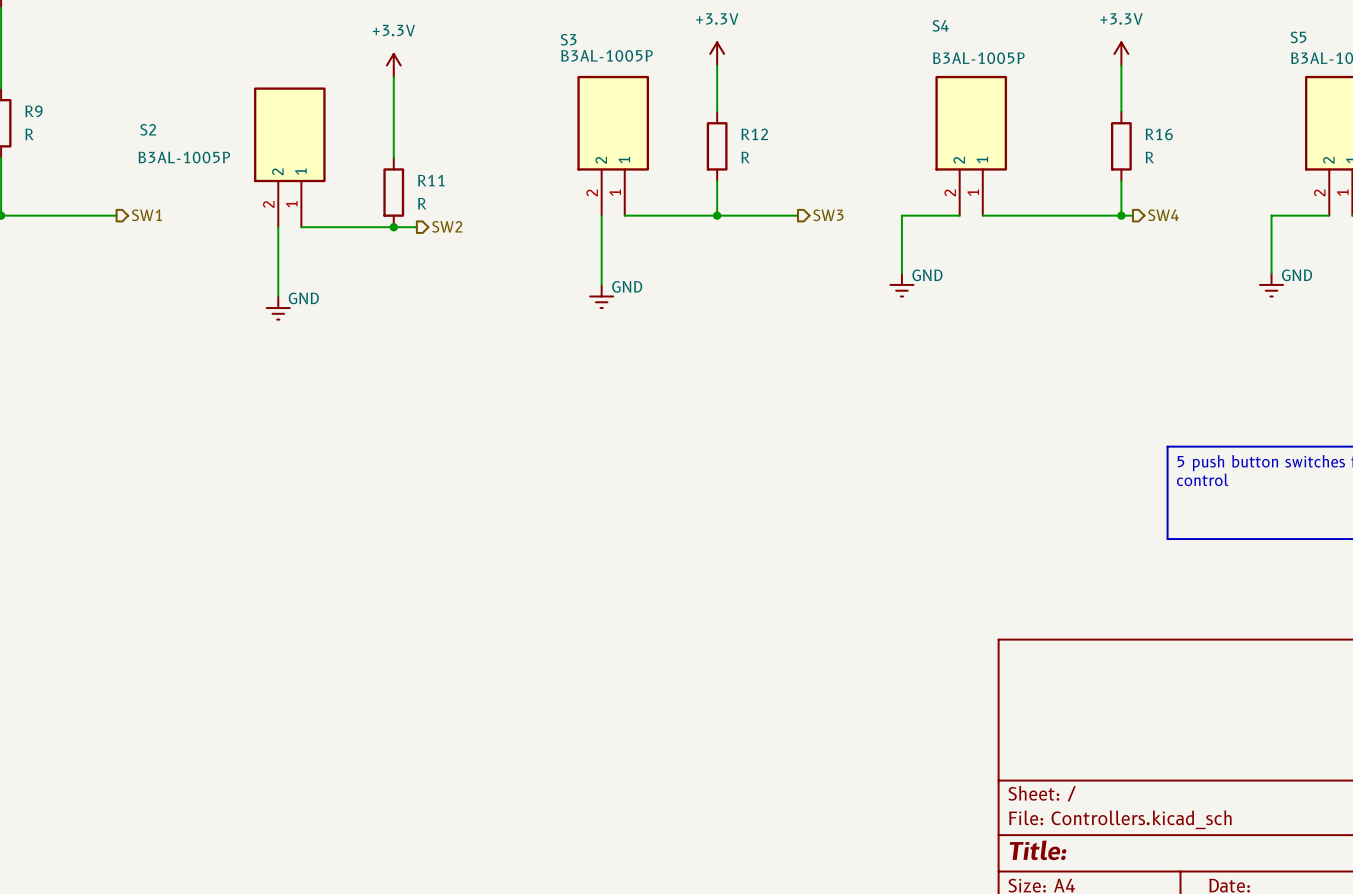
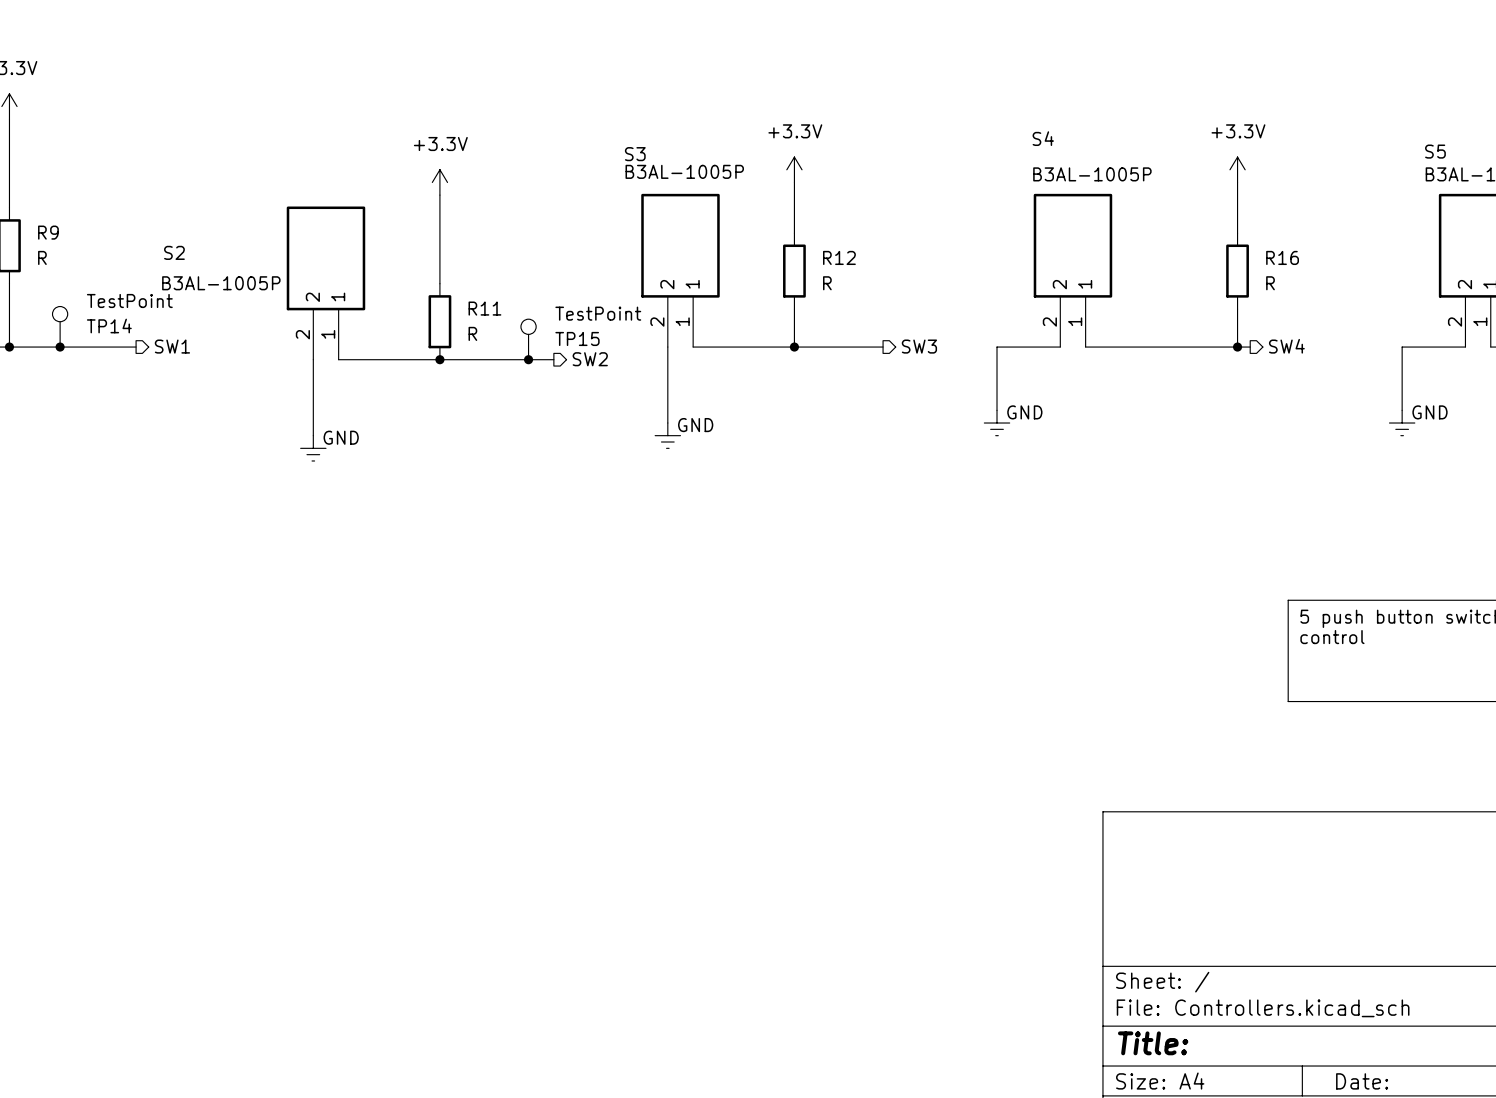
TP14: none -> TestPoint (60, 326)
TP15: none -> TestPoint (528, 339)
junction: none -> (60, 347)
hierarchical label position: SW2 (447, 226) -> SW2 (590, 359)
wire: none -> (465, 359) (553, 359)
junction: none -> (528, 359)

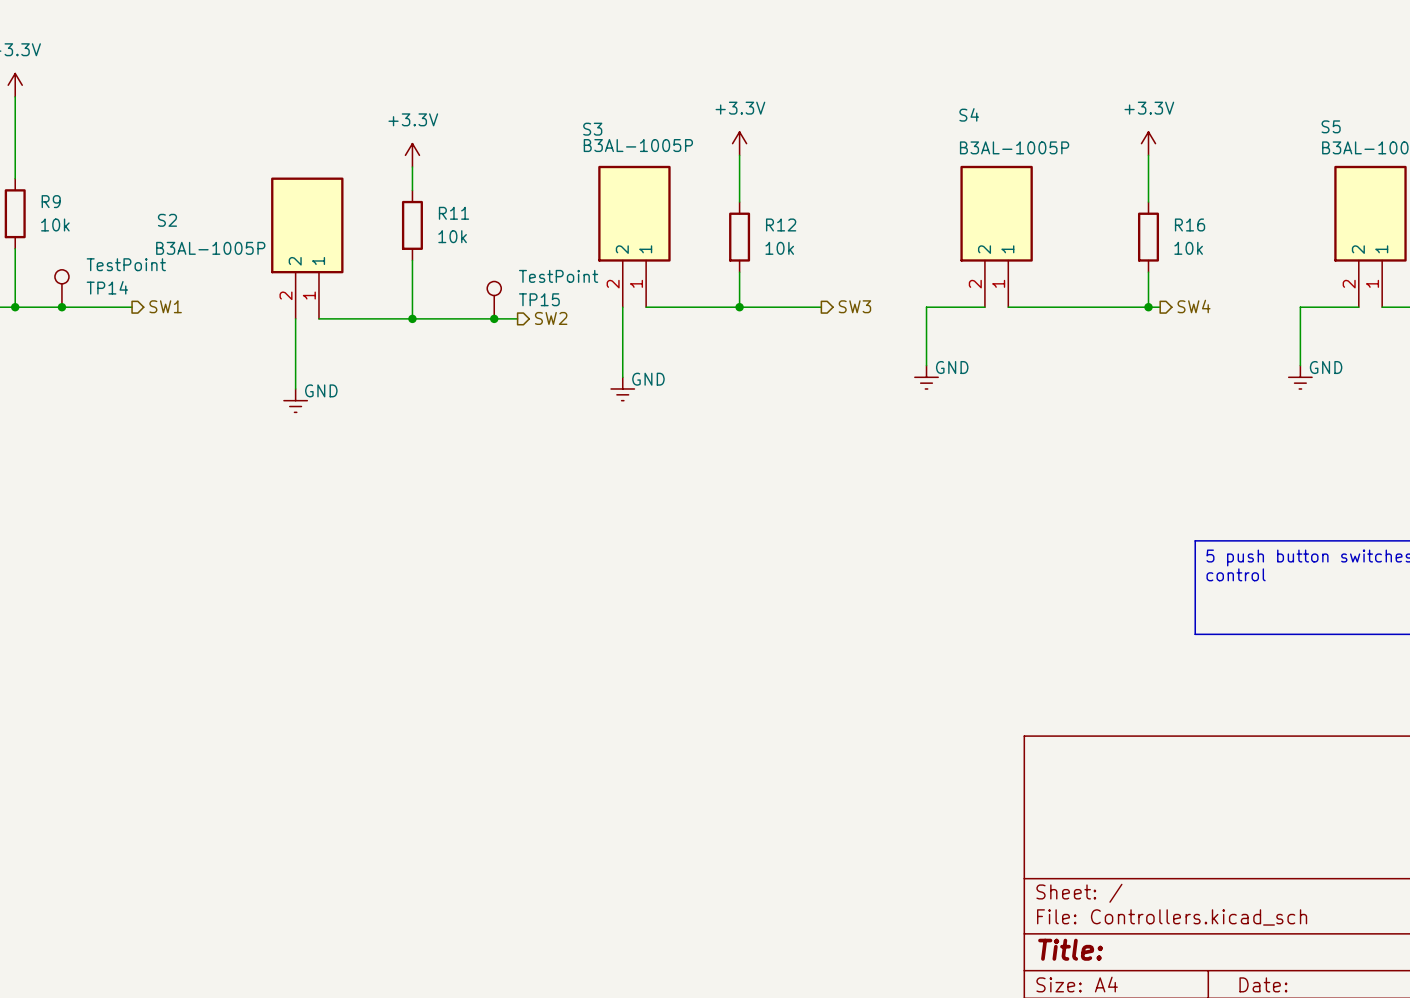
wire: (439, 220) (439, 283) -> (412, 260) (412, 318)
R9 value: R (42, 257) -> 10k (55, 224)
R12 value: R (827, 283) -> 10k (779, 248)
R16 value: R (1270, 283) -> 10k (1188, 248)
R11 position: (439, 321) -> (412, 225)
R11 value: R (472, 333) -> 10k (452, 236)

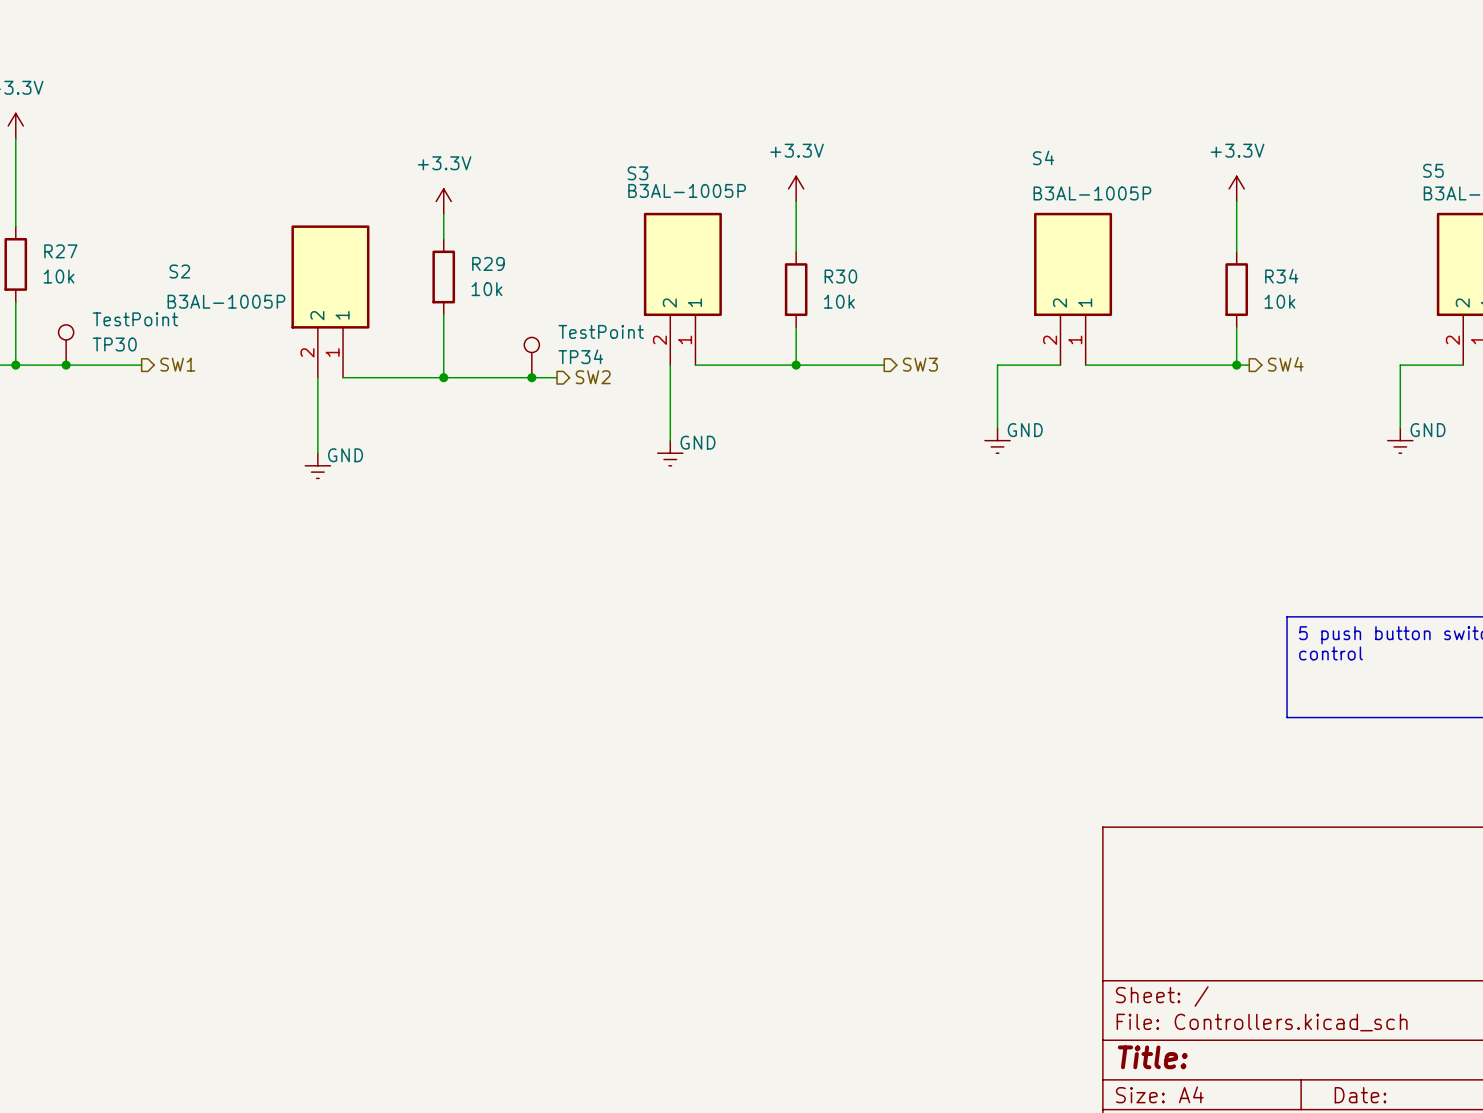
R9 name: R9 (51, 201) -> R27 (60, 251)
R11 name: R11 (453, 213) -> R29 (488, 263)
R12 name: R12 (781, 224) -> R30 (840, 276)
R16 name: R16 (1190, 224) -> R34 (1281, 276)
TP14 name: TP14 (107, 287) -> TP30 (114, 344)
TP15 name: TP15 (539, 299) -> TP34 (580, 356)

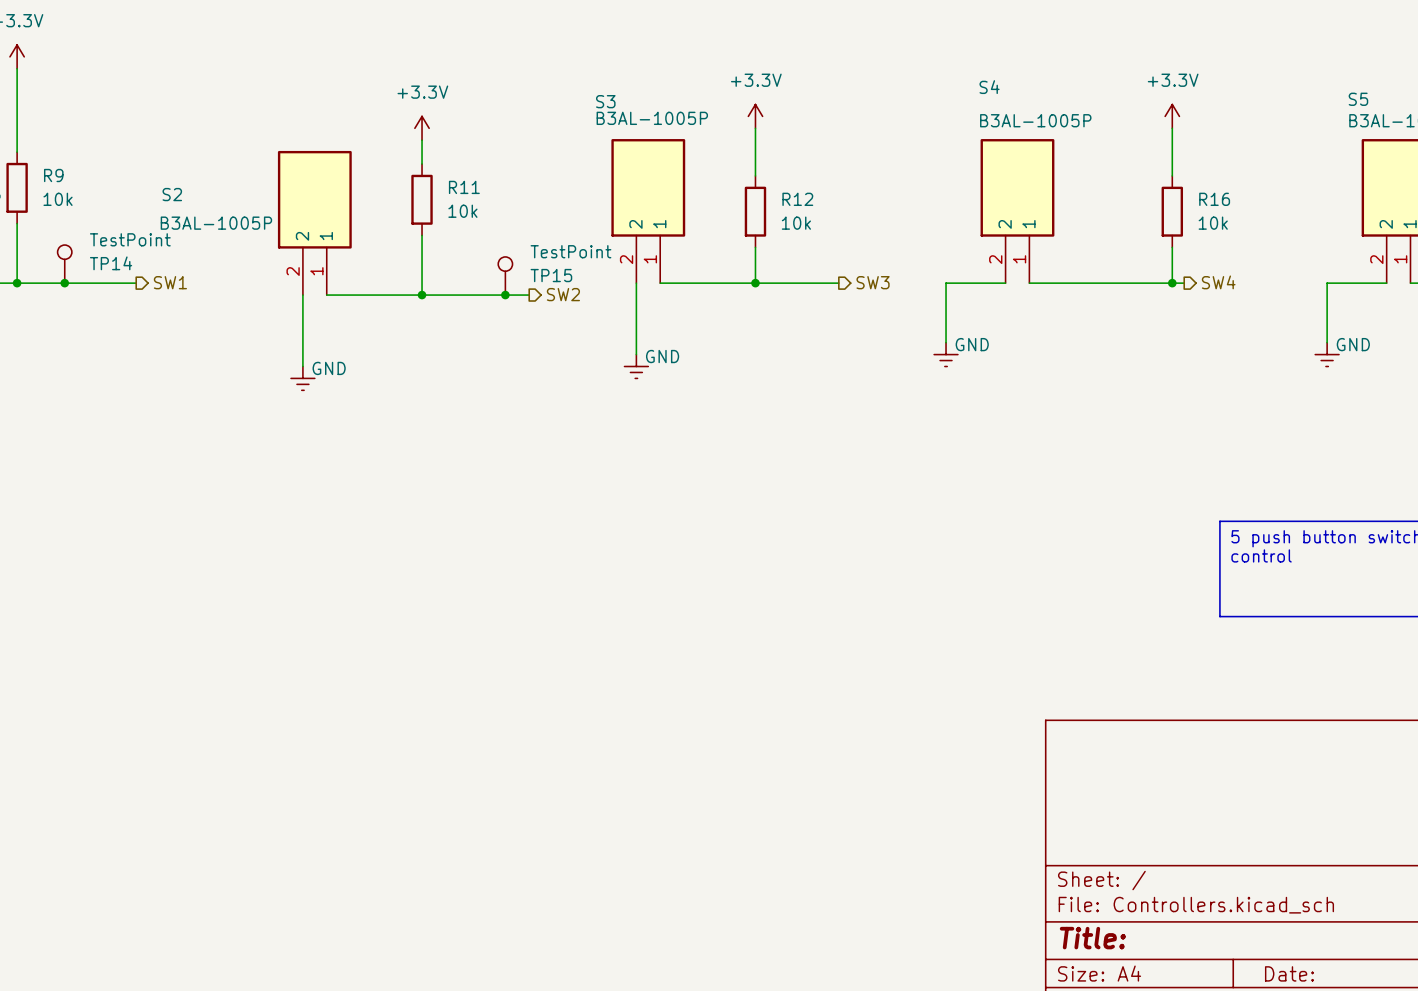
R27 name: R27 (60, 251) -> R9 (53, 175)
R29 name: R29 (488, 263) -> R11 (464, 187)
R30 name: R30 (840, 276) -> R12 (797, 199)
R34 name: R34 (1281, 276) -> R16 (1214, 199)
TP30 name: TP30 (114, 344) -> TP14 (111, 263)
TP34 name: TP34 (580, 356) -> TP15 (551, 275)

